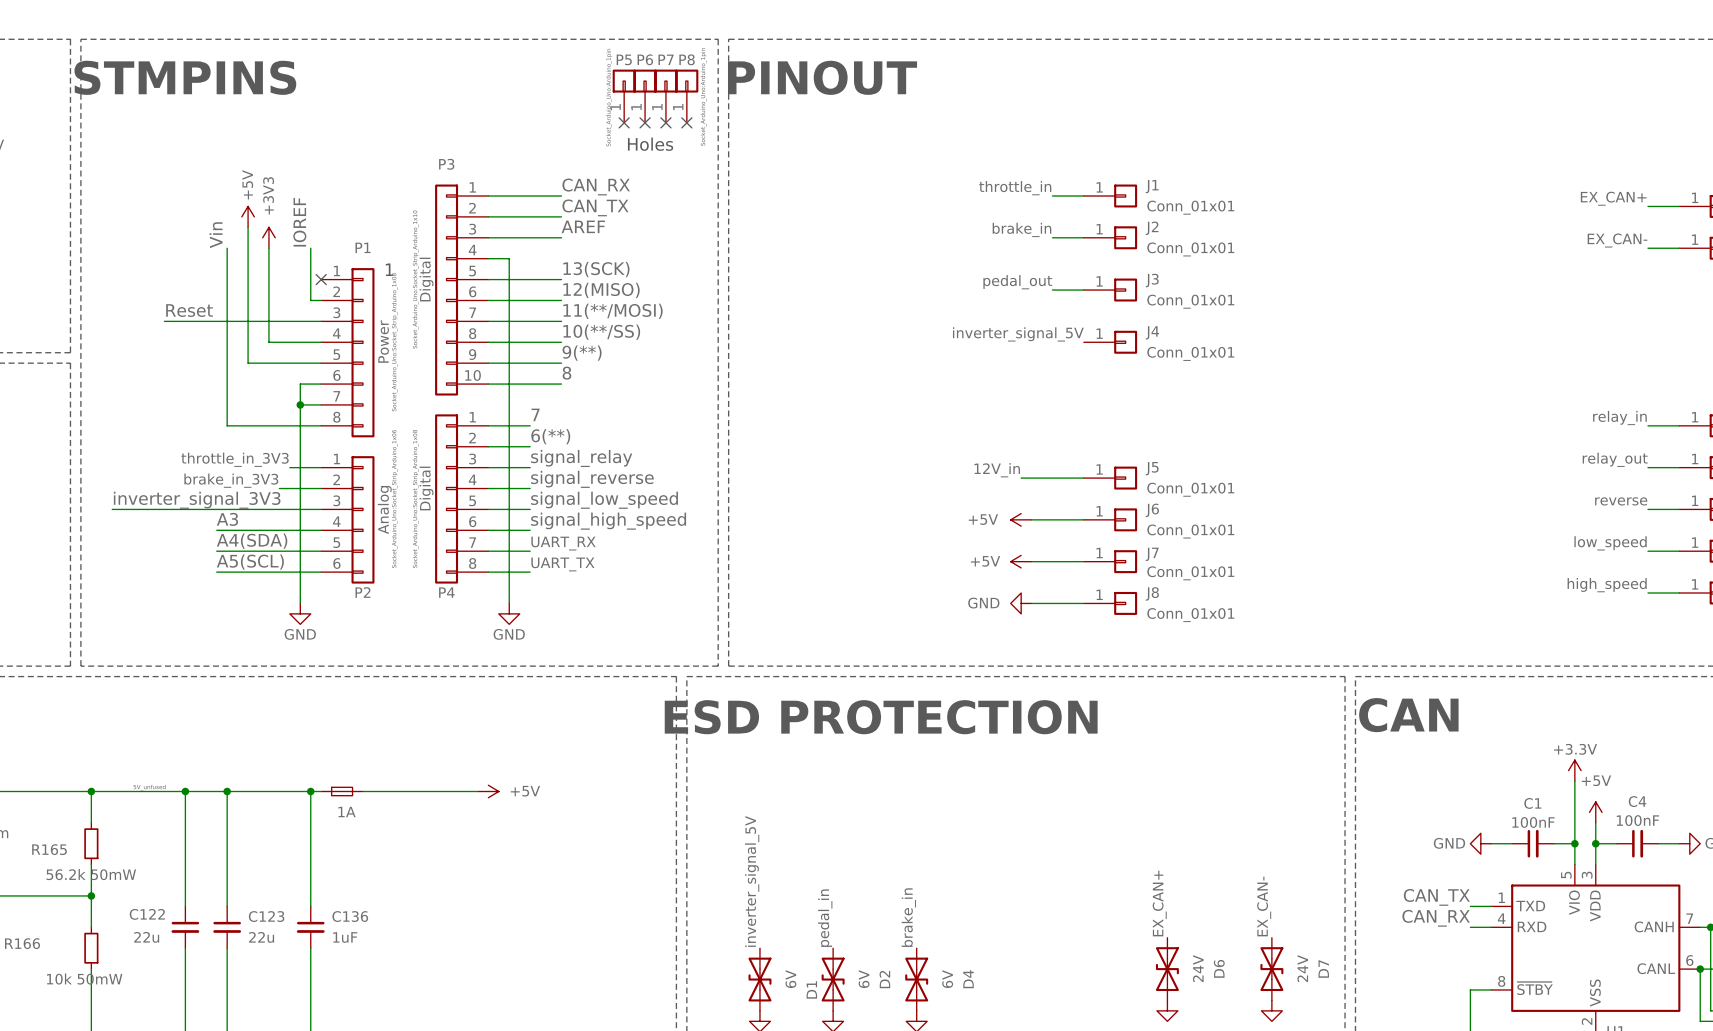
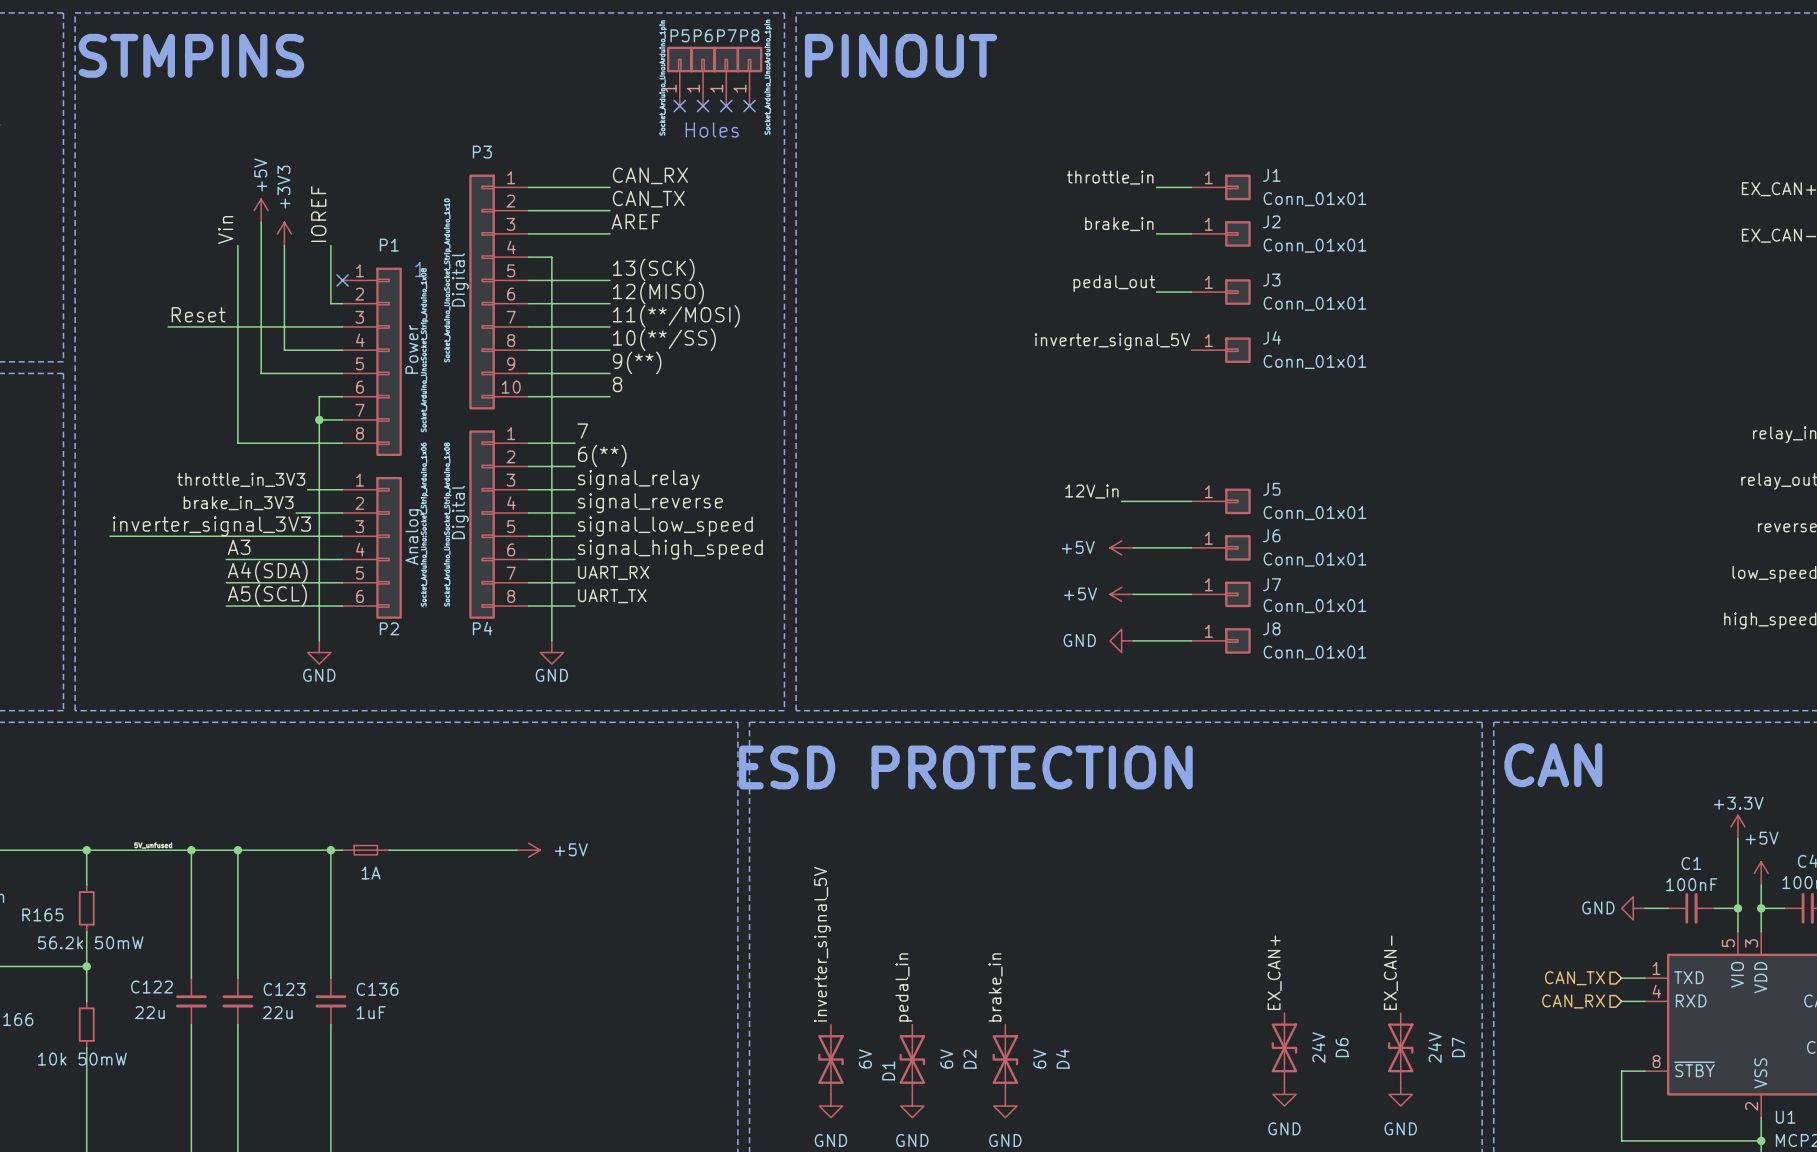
label: CAN_TX (1436, 897) -> none
hierarchical label: none -> CAN_TX (1574, 978)
label: CAN_RX (1436, 918) -> none
hierarchical label: none -> CAN_RX (1573, 1001)

